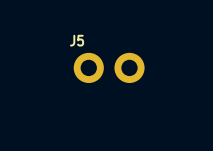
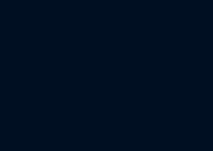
J5: (109, 67) -> none

